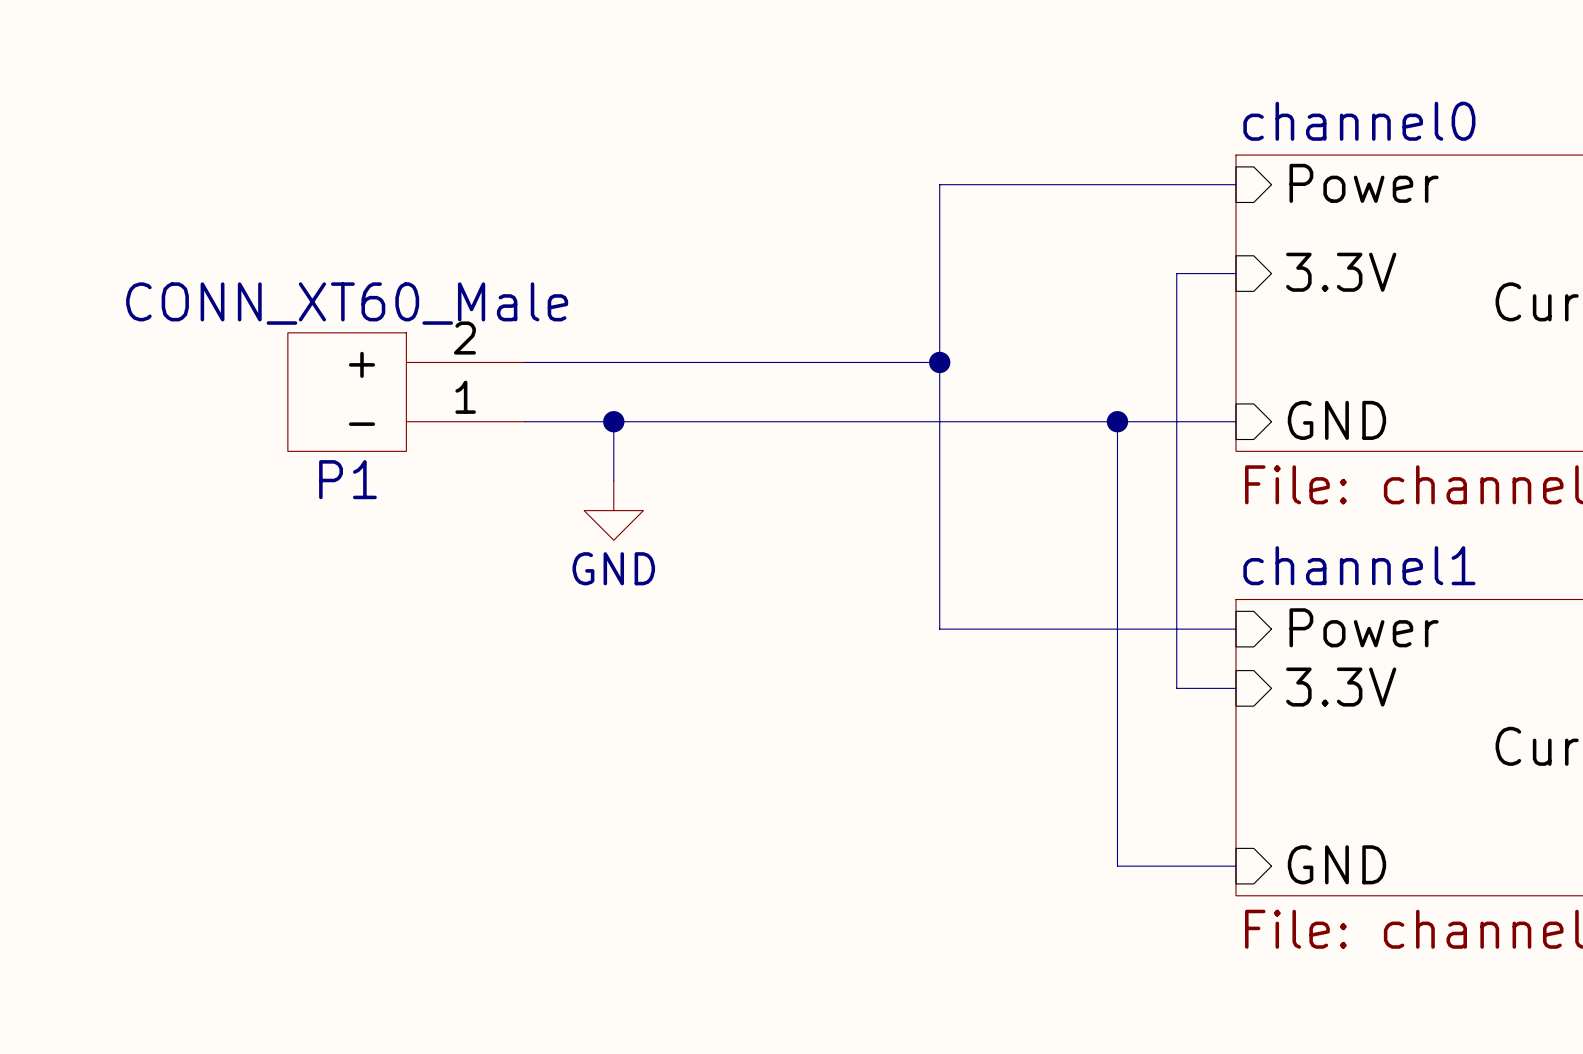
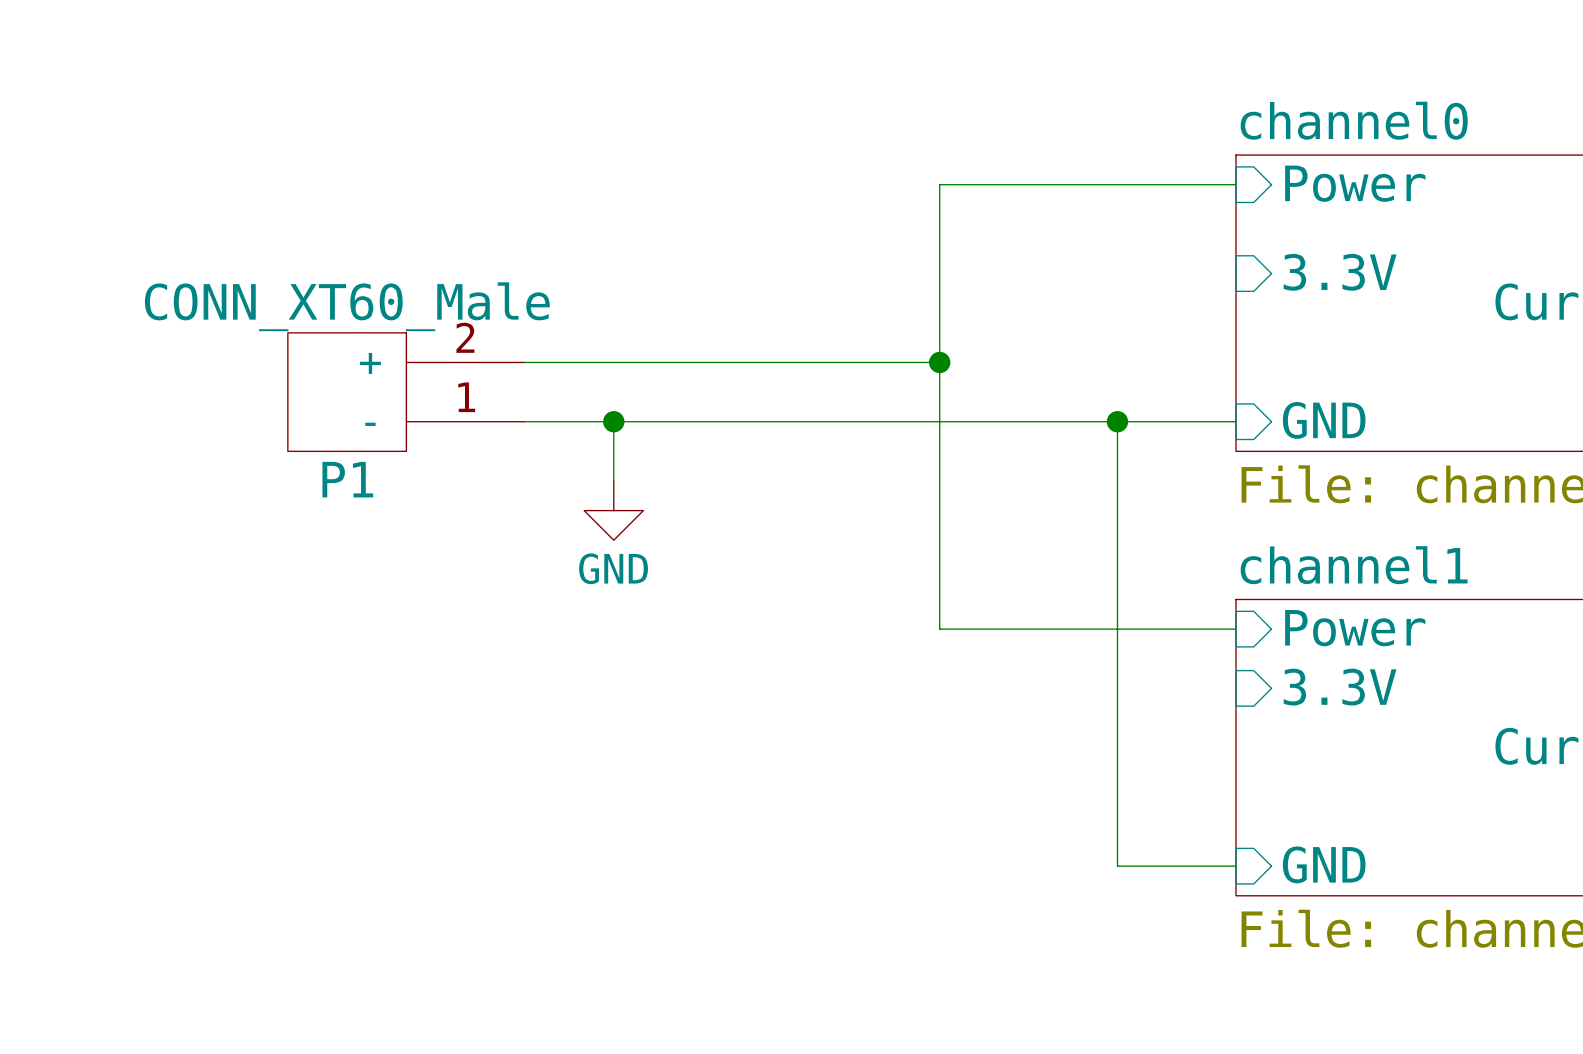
wire: (1235, 273) (1176, 273) (1176, 688) (1235, 688) -> none

